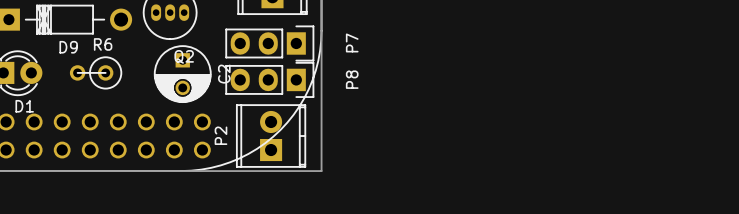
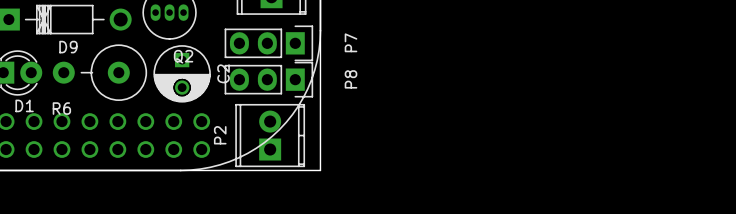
R6 name position: R6 (103, 44) -> R6 (61, 108)
R6 footprint: [69, 56, 123, 90] -> [52, 44, 148, 101]

